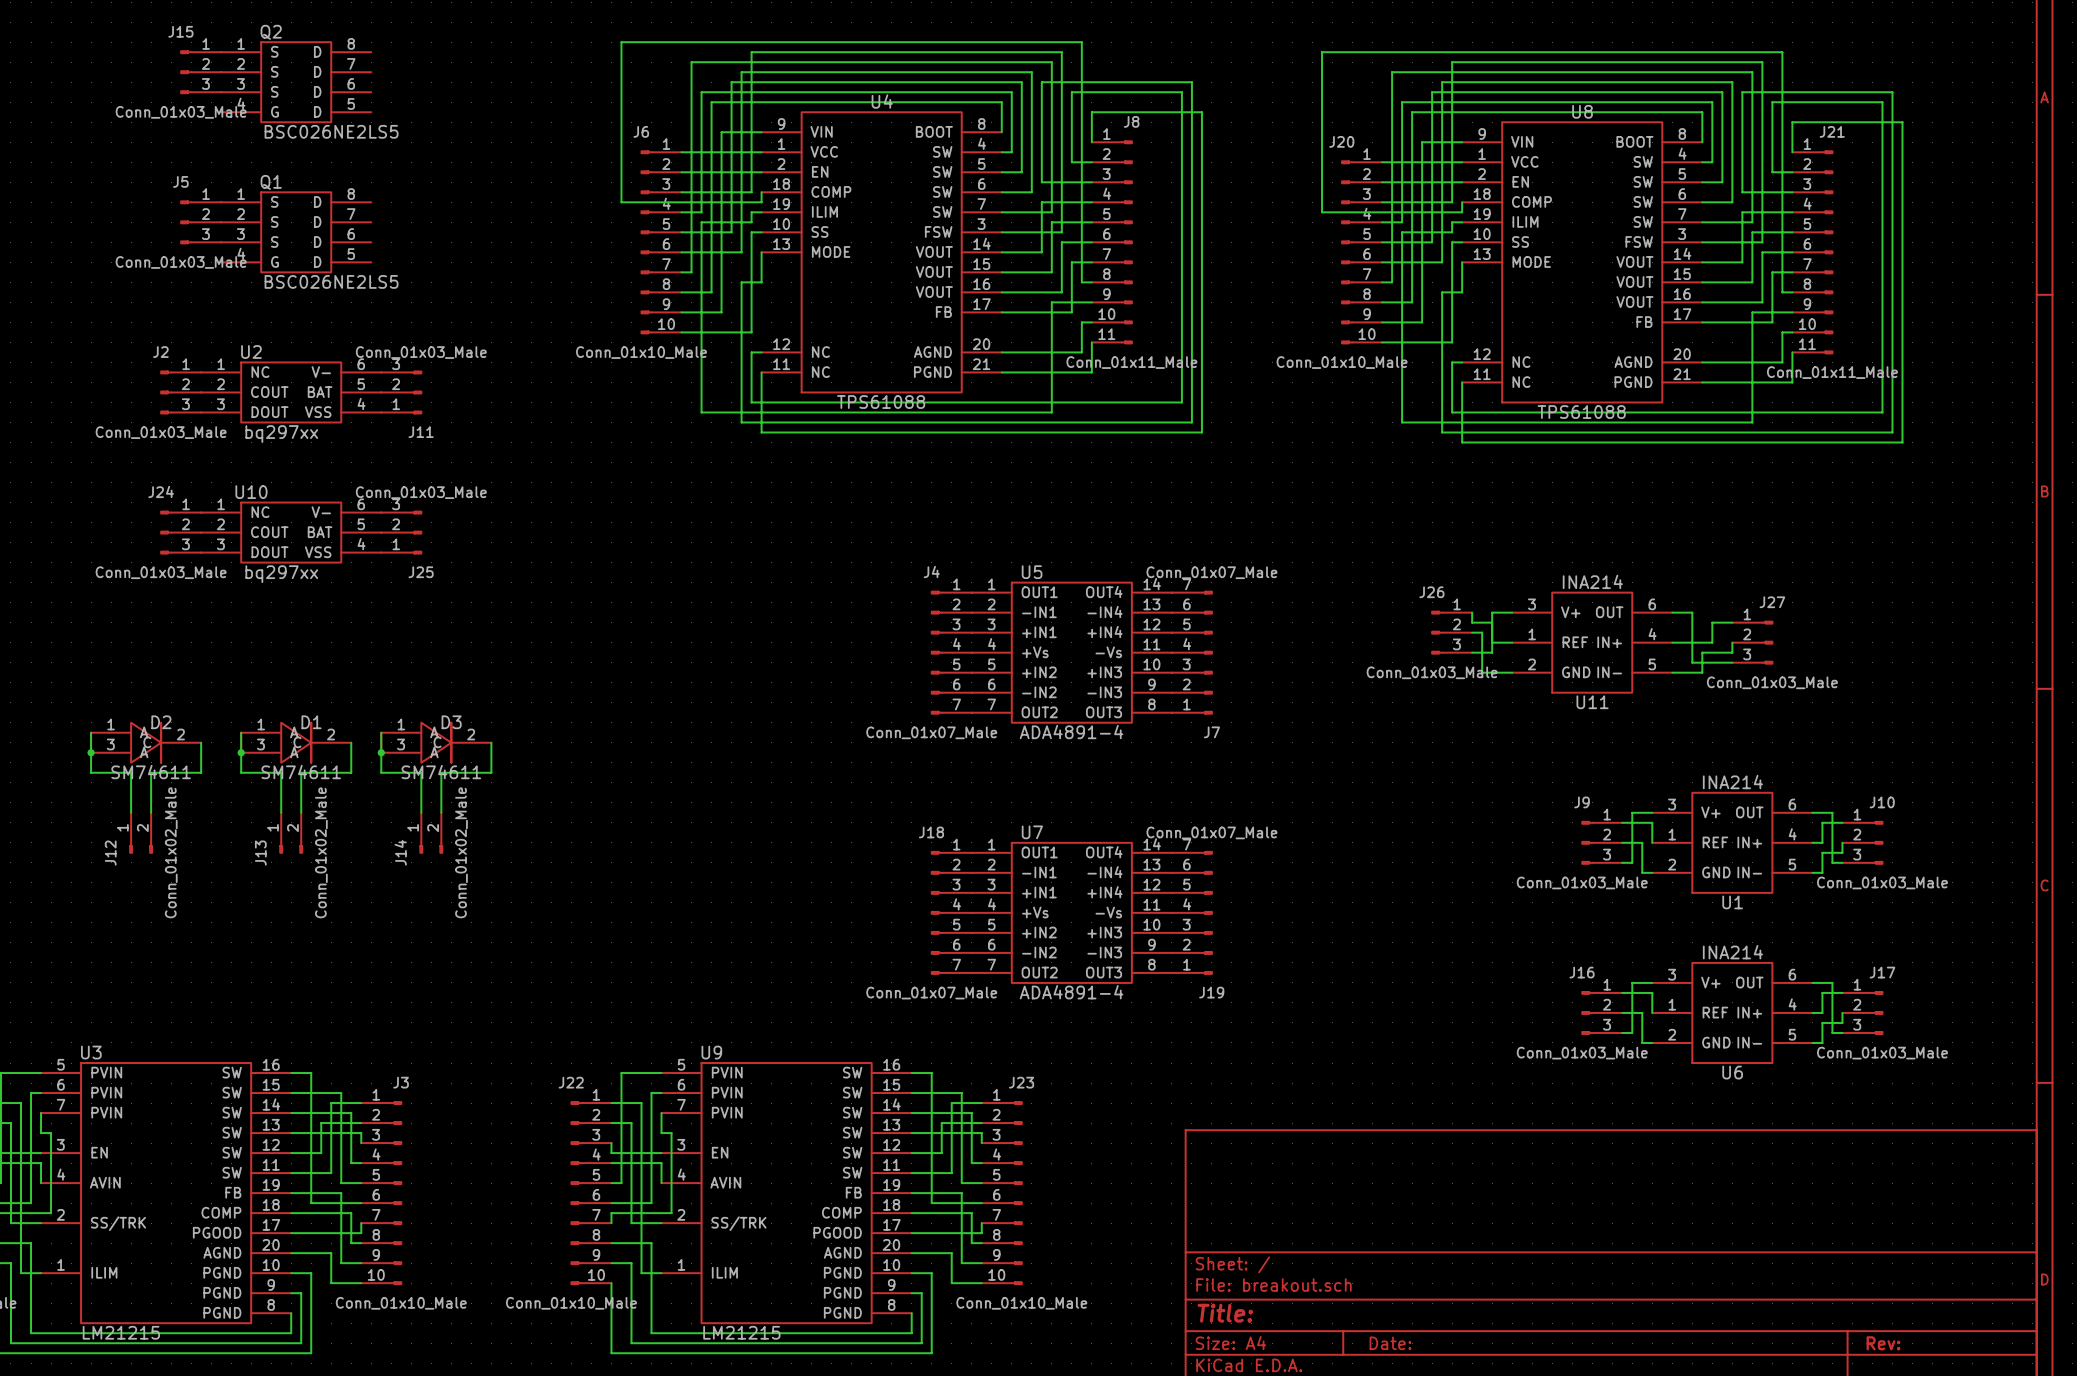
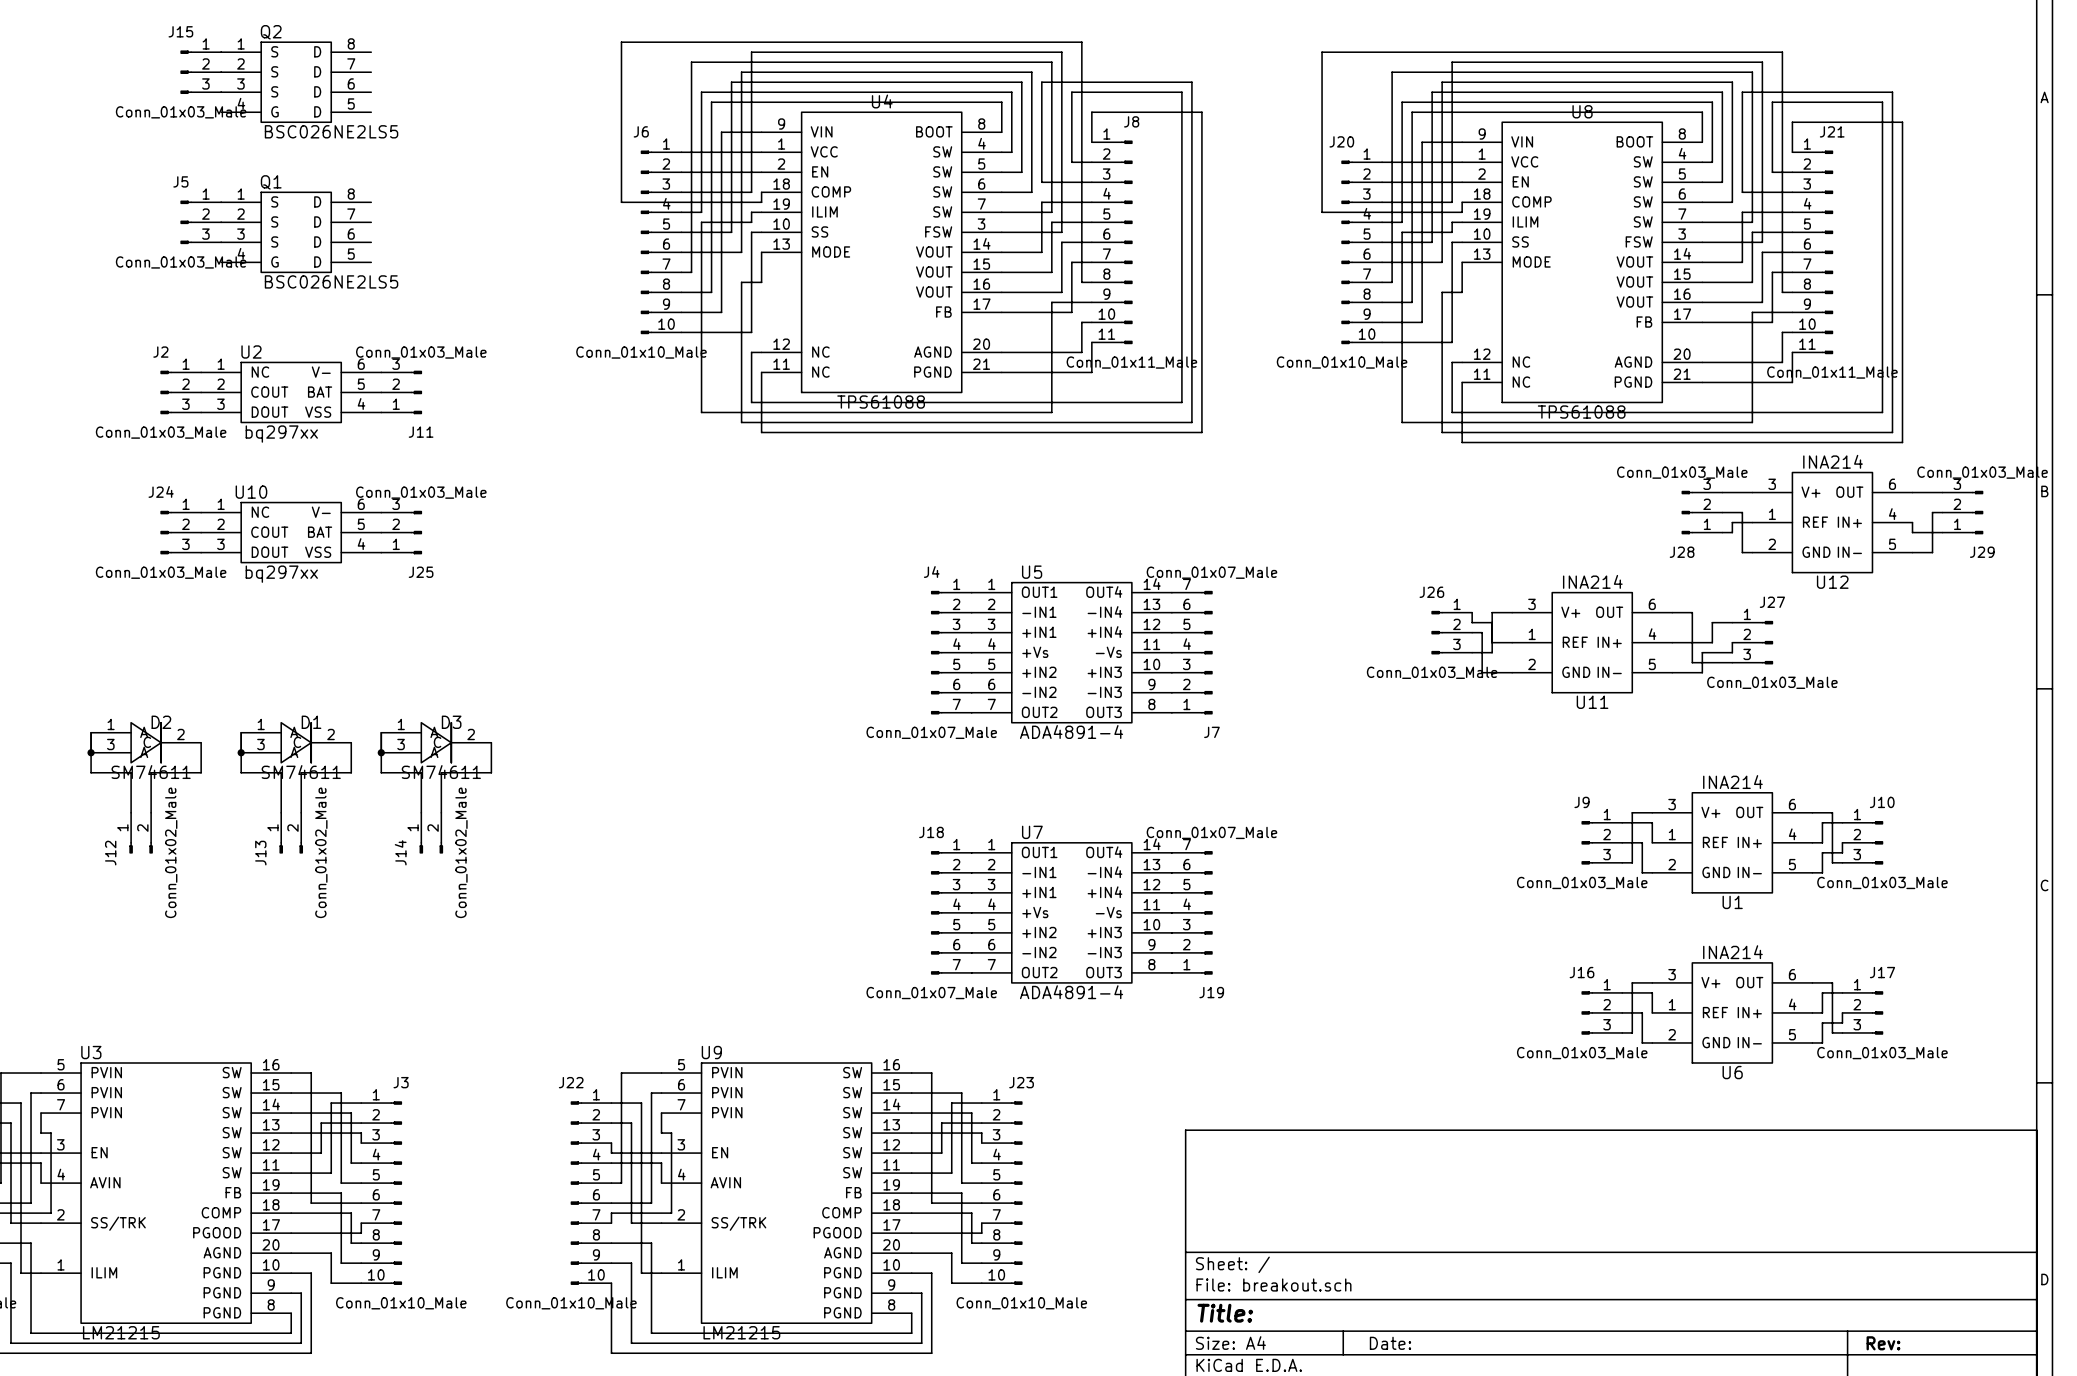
wire: none -> (1722, 492) (1752, 492)
wire: none -> (1912, 492) (1942, 492)
J28: none -> Conn_01x03_Male (1702, 512)
wire: none -> (1722, 512) (1742, 512) (1742, 552) (1752, 552)
wire: none -> (1942, 512) (1932, 512) (1932, 552) (1912, 552)
J29: none -> Conn_01x03_Male (1962, 512)
wire: none -> (1752, 522) (1732, 522) (1732, 532) (1722, 532)
U12: none -> INA214 (1832, 522)
wire: none -> (1912, 522) (1912, 532) (1942, 532)

